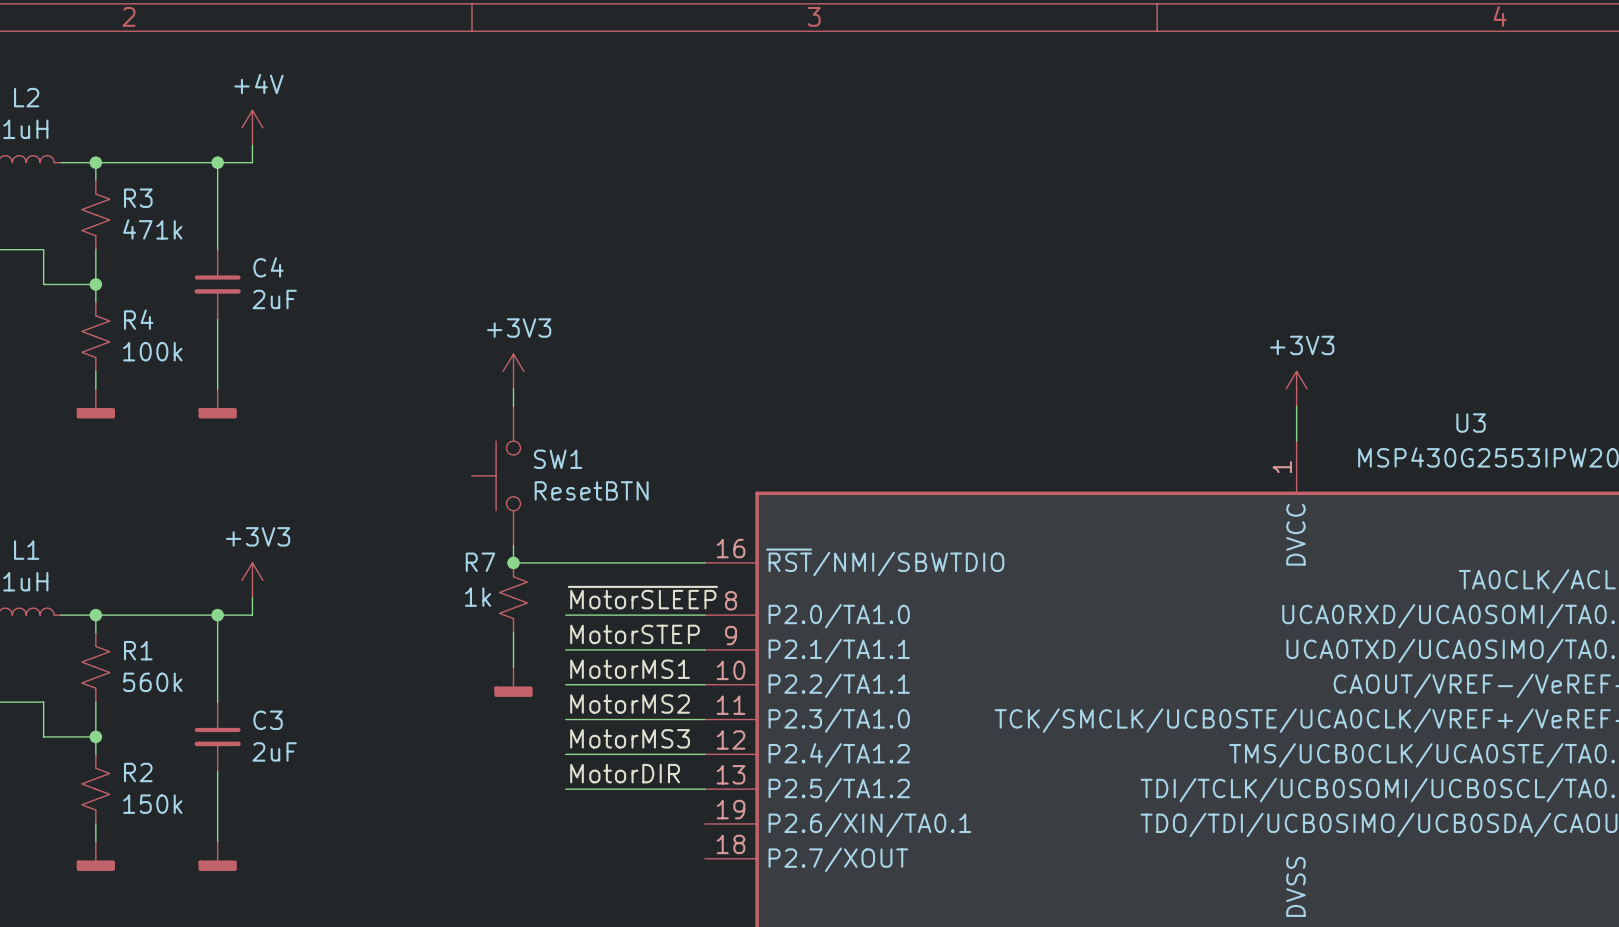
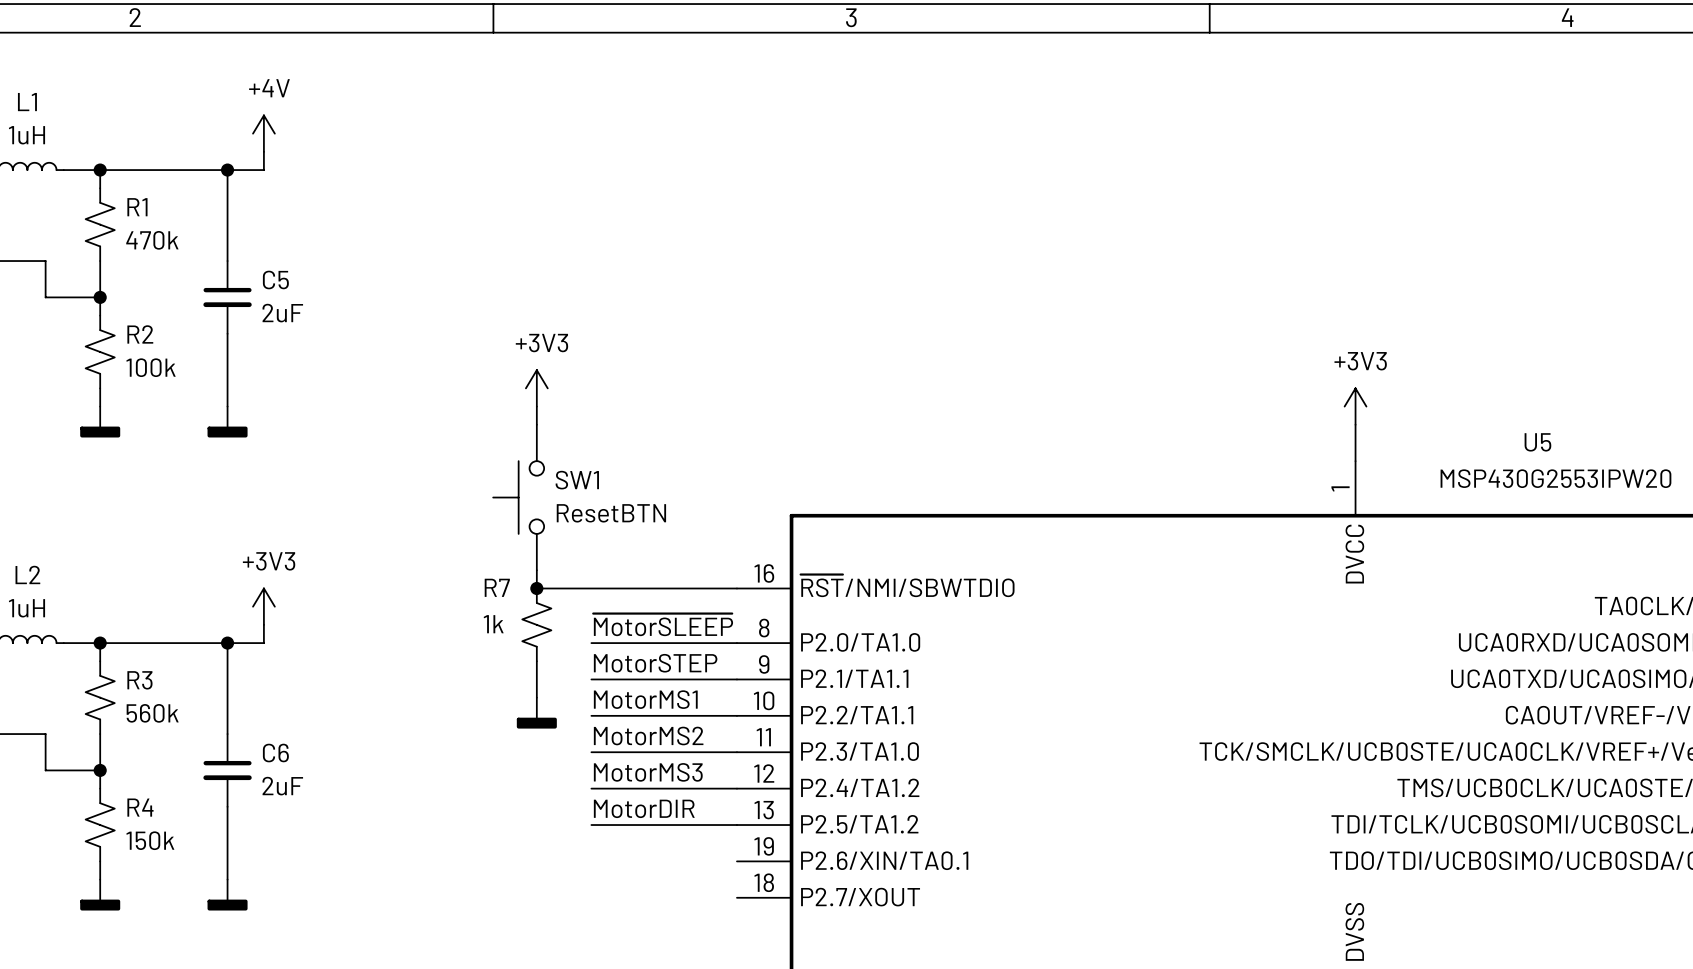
L2 name: L2 (26, 97) -> L1 (27, 102)
R3 name: R3 (138, 198) -> R1 (137, 207)
R3 value: 471k (152, 229) -> 470k (152, 240)
C4 name: C4 (268, 267) -> C5 (275, 280)
R4 name: R4 (138, 319) -> R2 (140, 334)
U3 name: U3 (1471, 423) -> U5 (1537, 442)
L1 name: L1 (26, 550) -> L2 (27, 574)
R1 name: R1 (138, 650) -> R3 (139, 680)
C3 name: C3 (268, 720) -> C6 (275, 753)
R2 name: R2 (138, 772) -> R4 (140, 807)

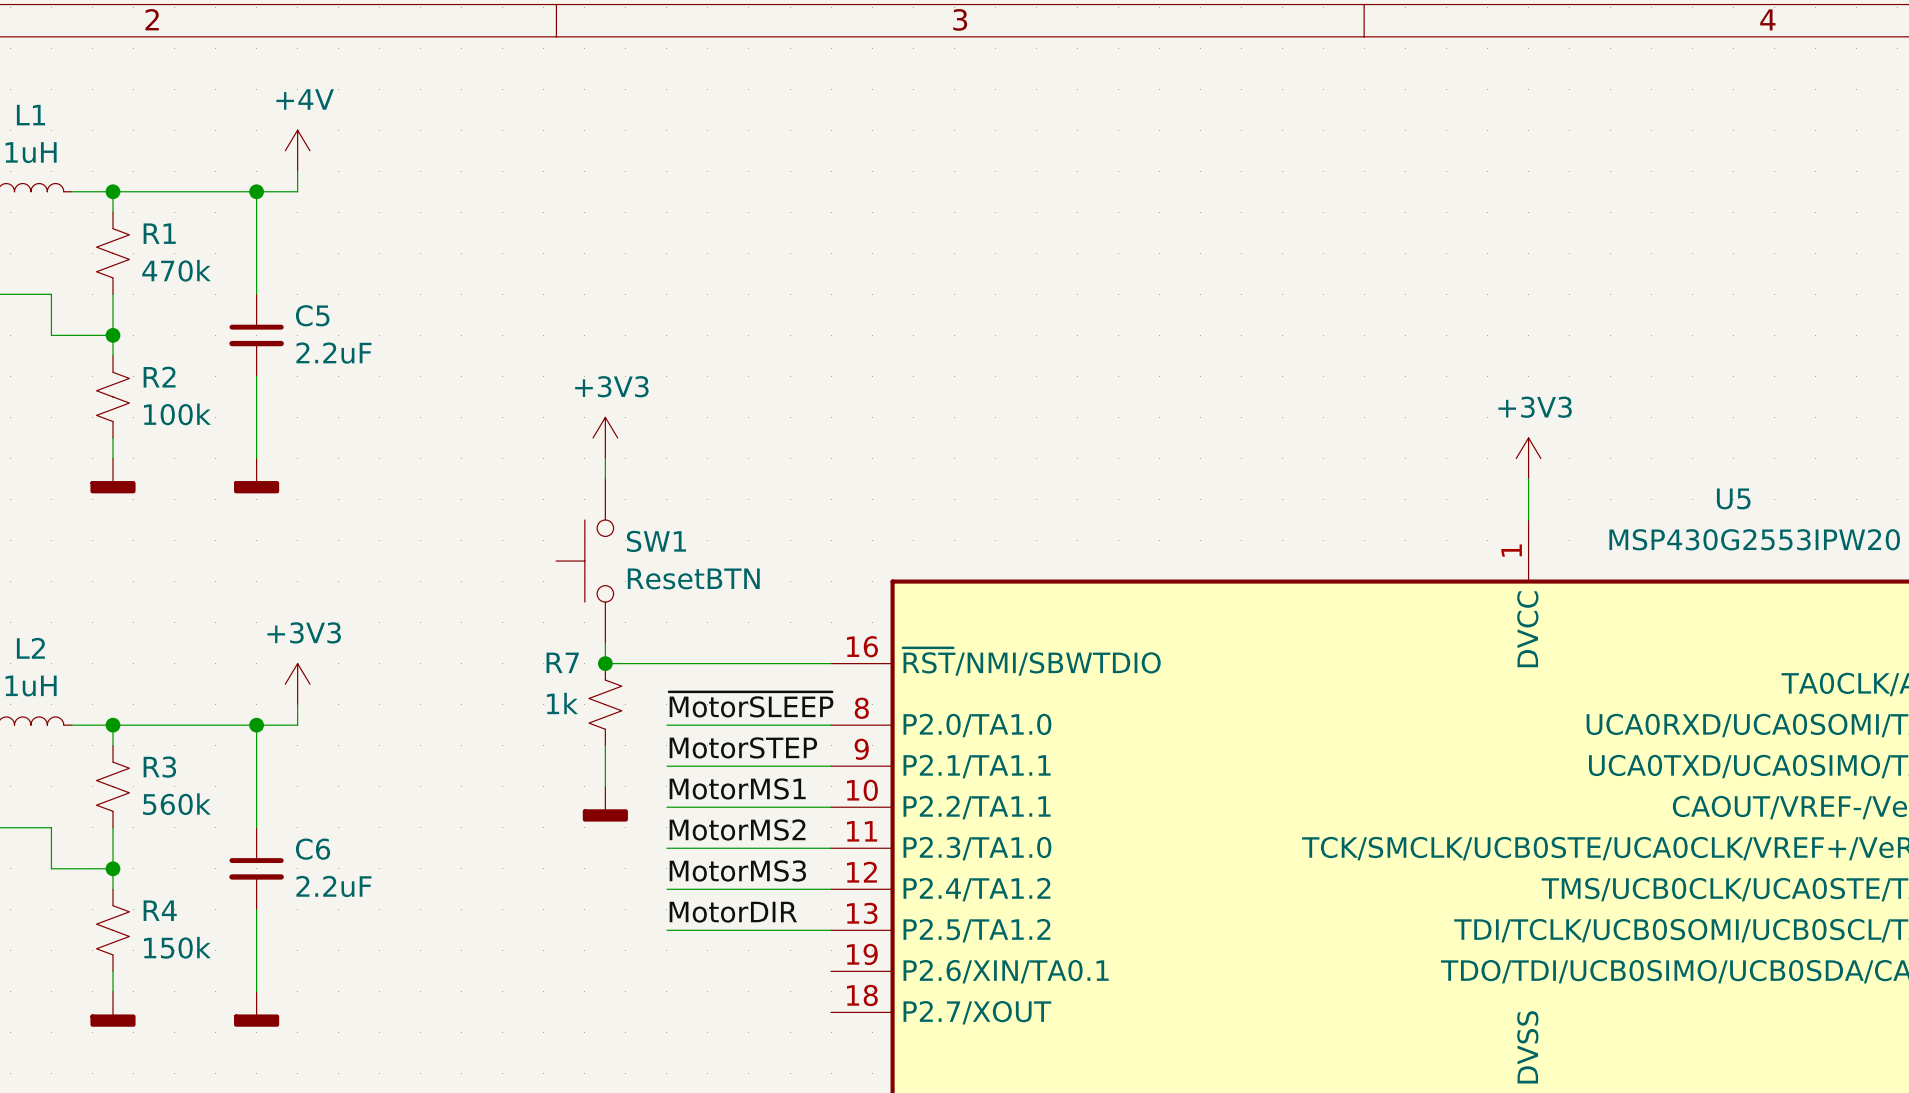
C5 value: 2uF (282, 313) -> 2.2uF (333, 353)
C6 value: 2uF (282, 786) -> 2.2uF (333, 886)

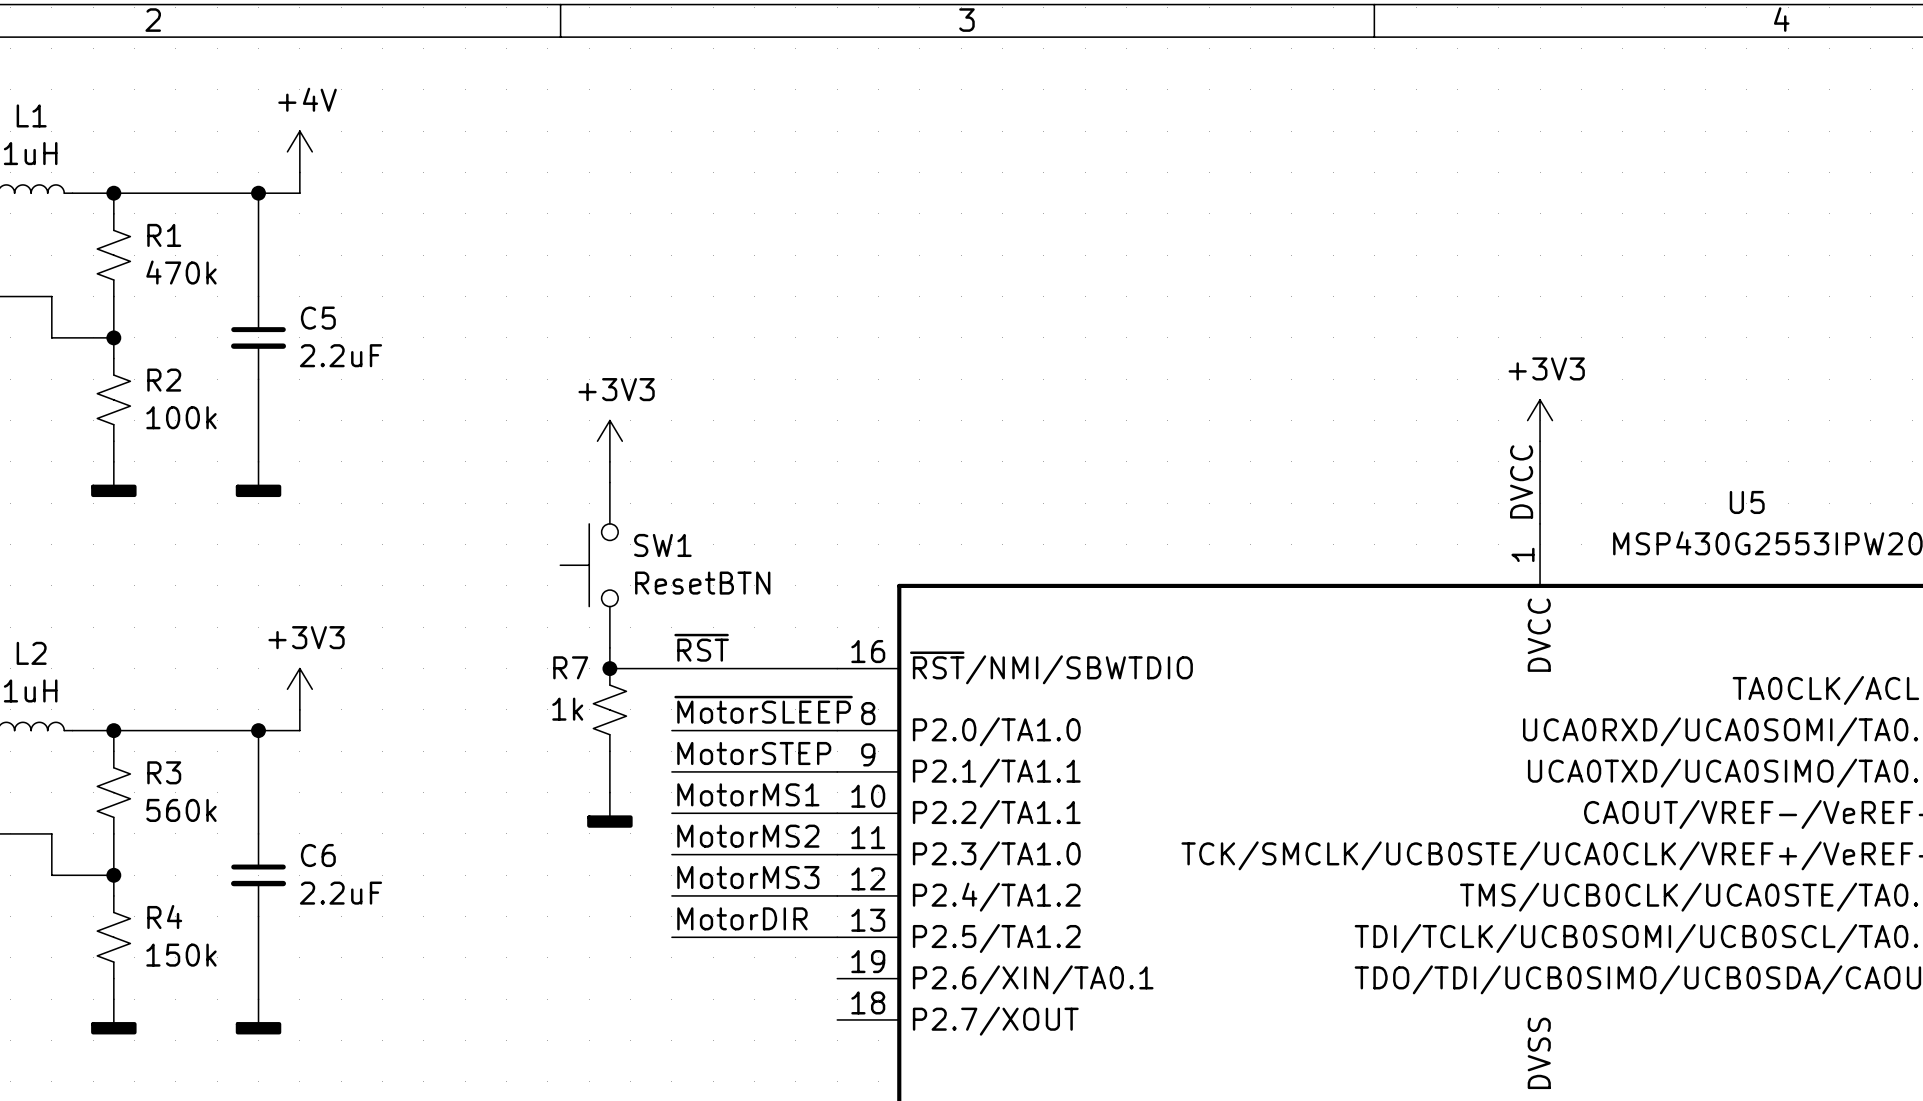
power symbol position: +3V3 (1528, 458) -> +3V3 (1540, 420)
label: none -> DVCC (1521, 481)
label: none -> ~{RST} (701, 647)

